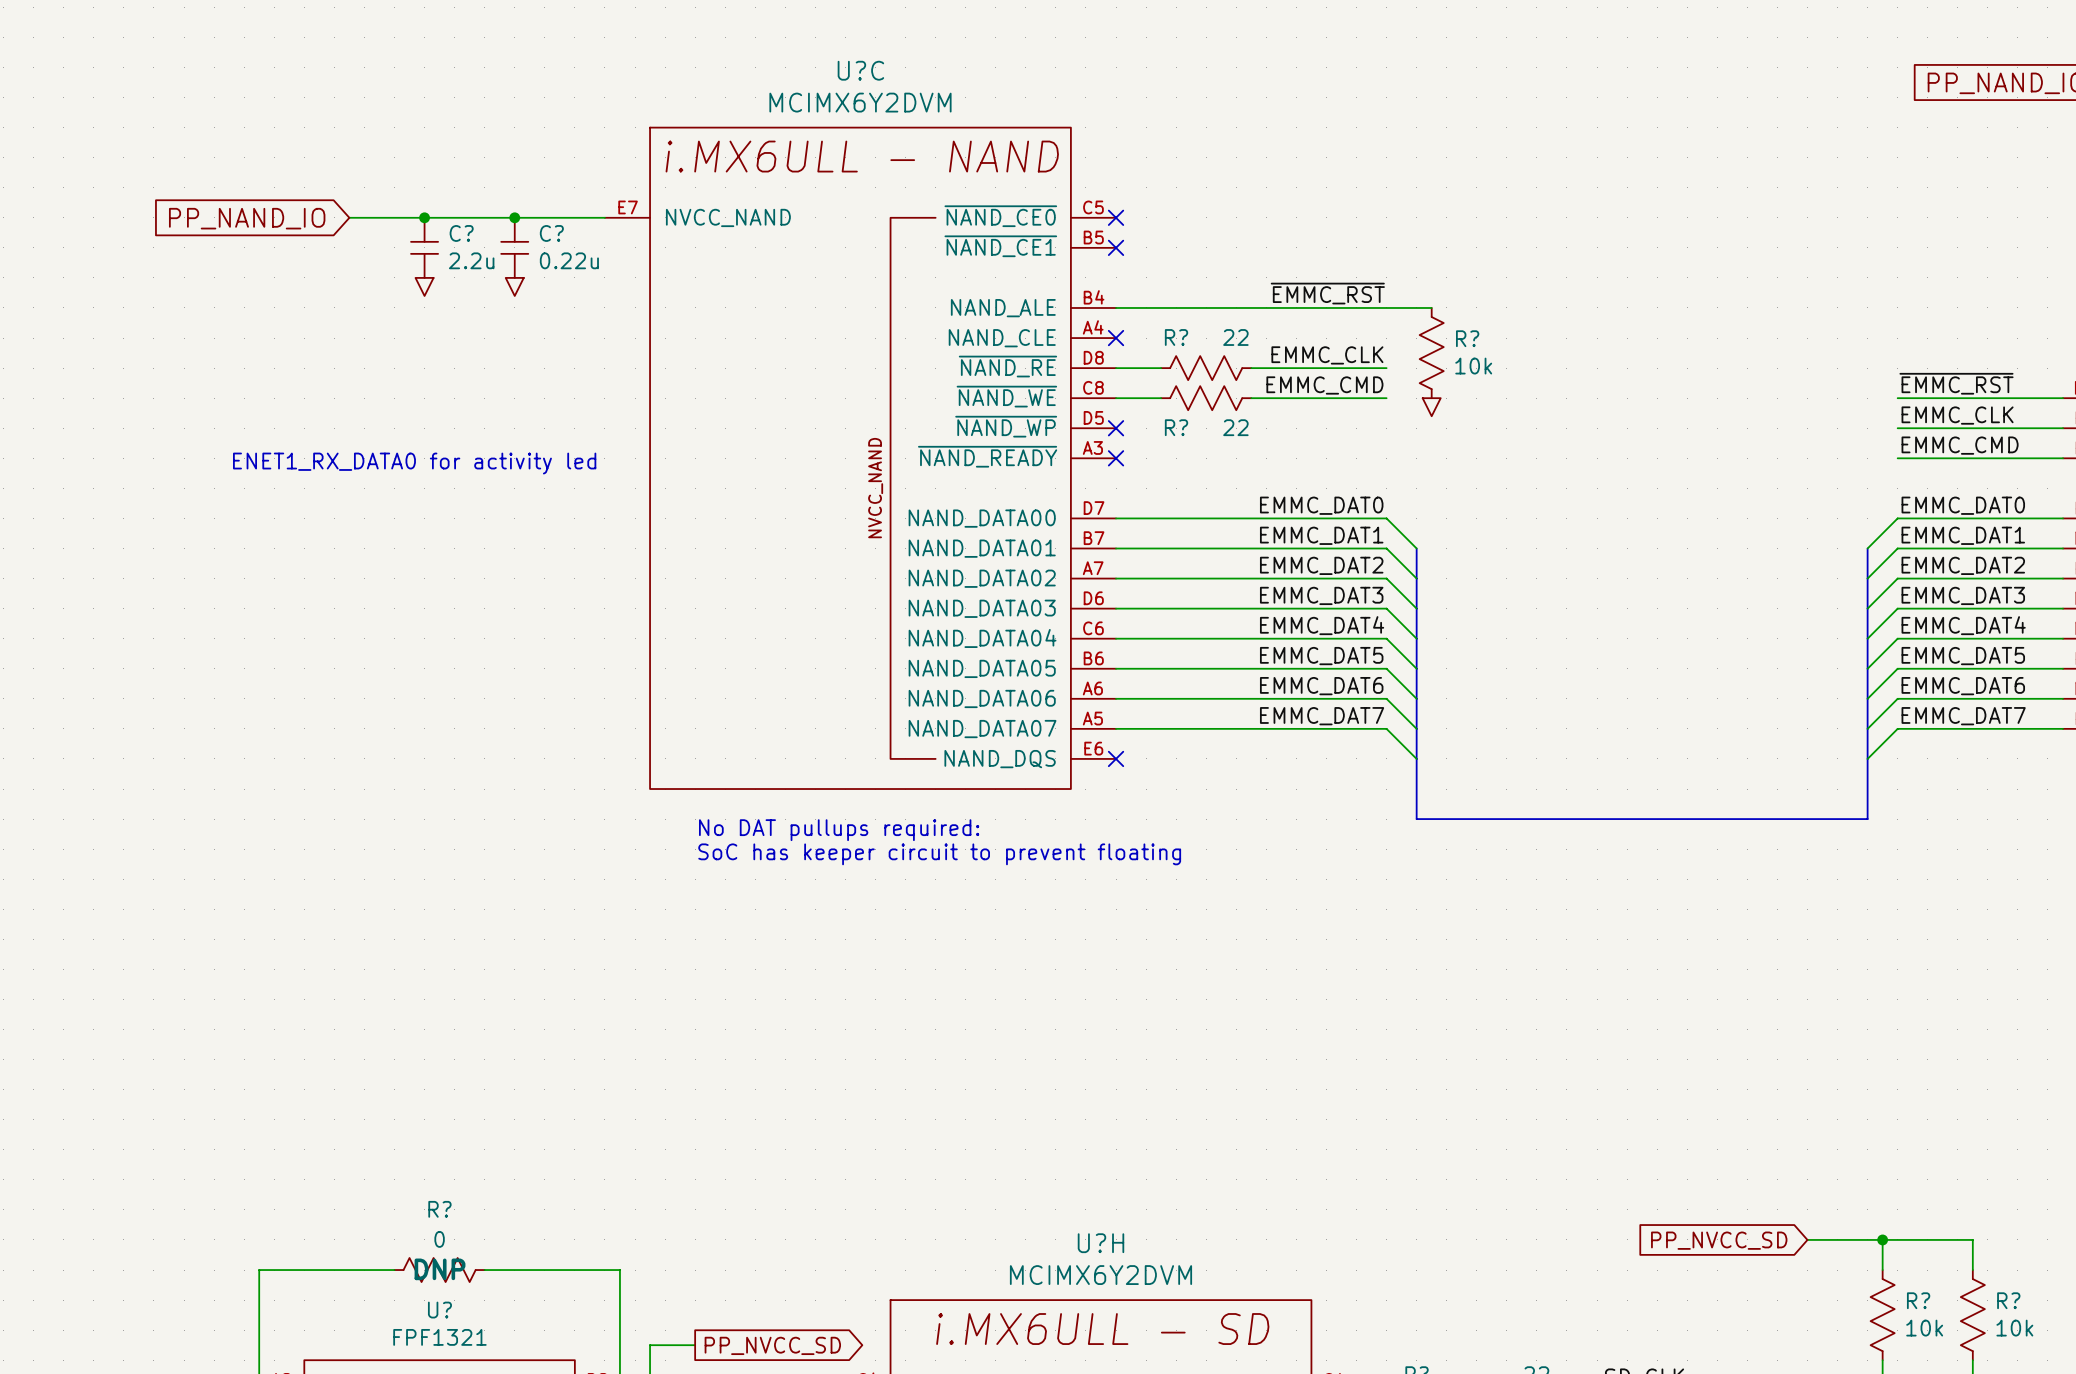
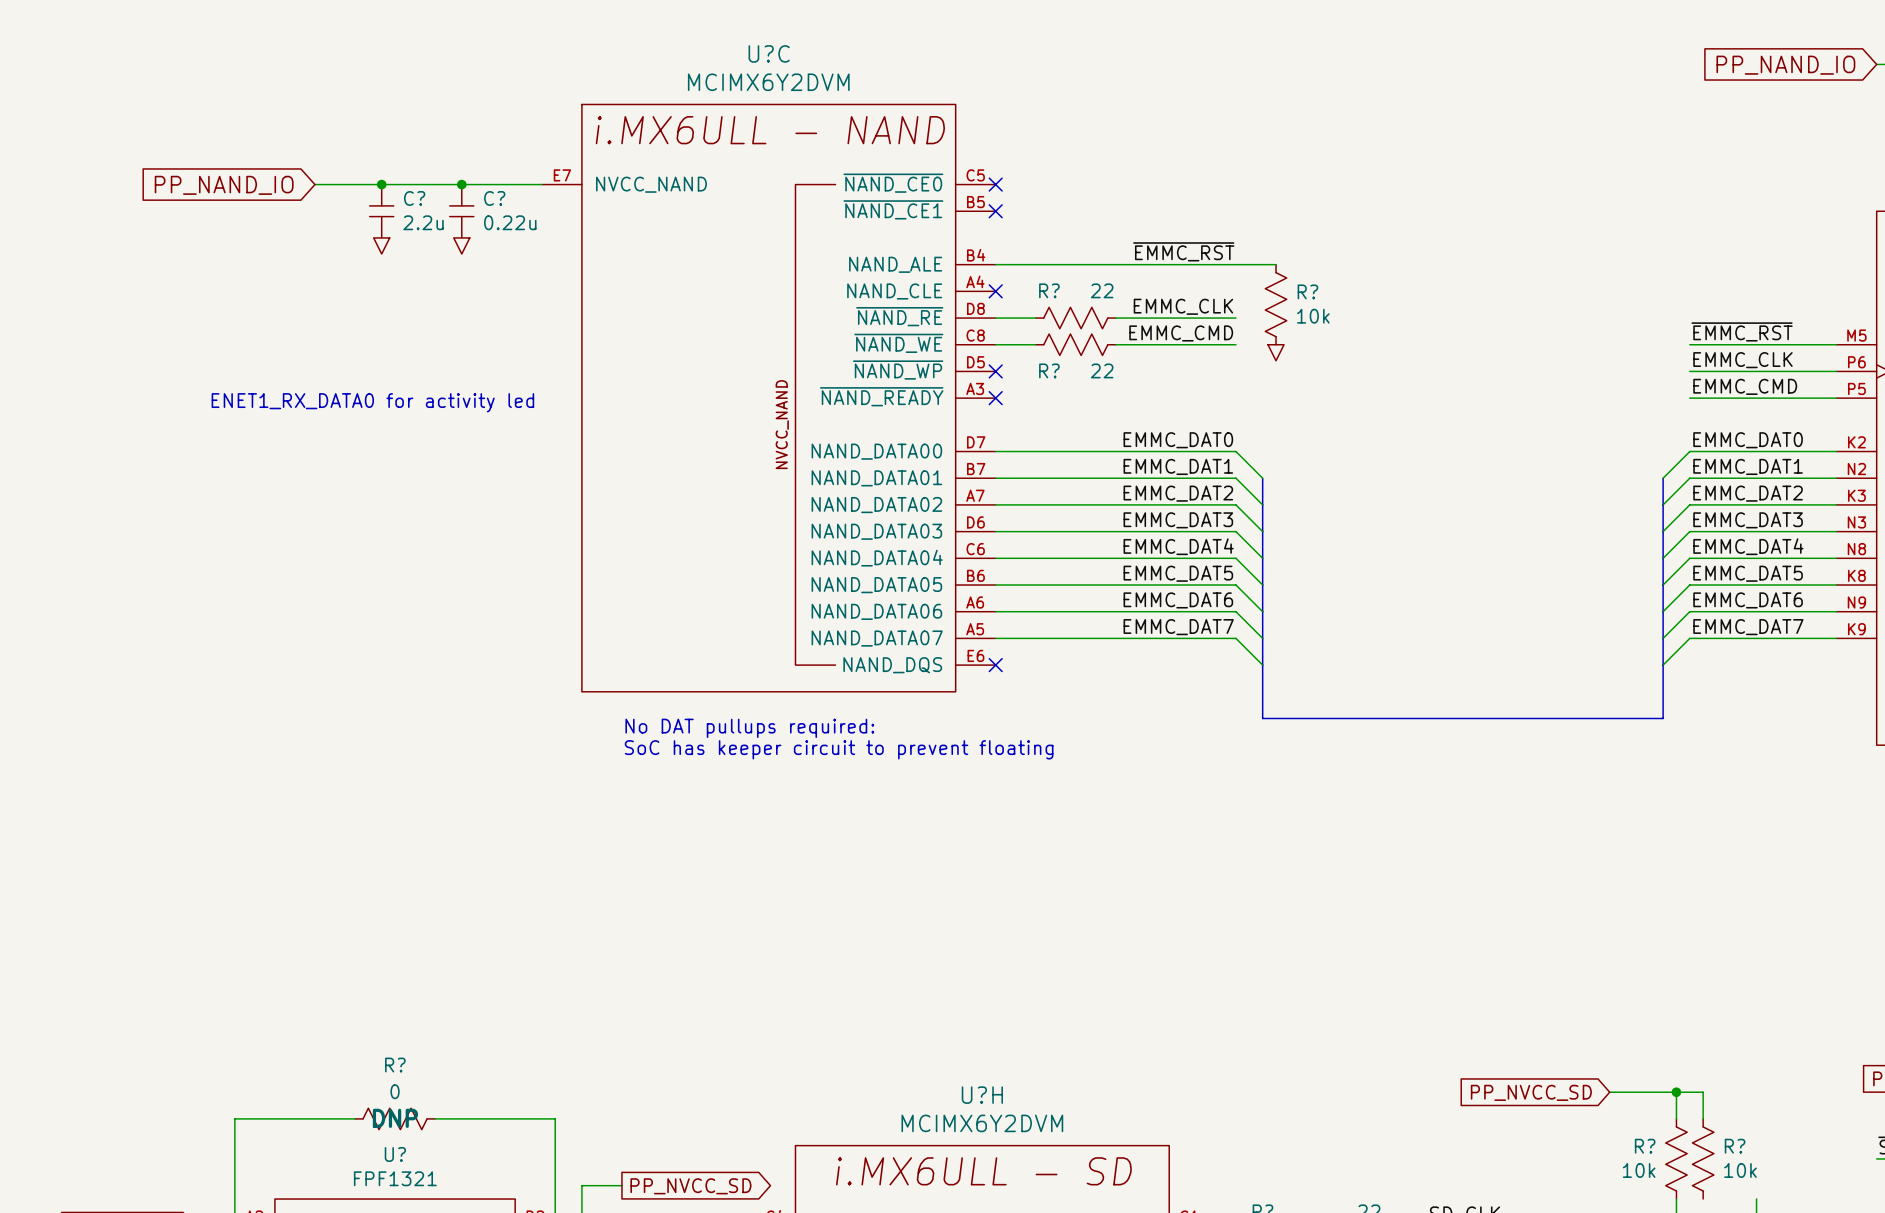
wire: (1912, 1239) (1972, 1239) (1972, 1270) -> (1703, 1092) (1703, 1118)
R? name position: R? (1918, 1300) -> R? (1645, 1146)
R? position: (1972, 1315) -> (1703, 1158)
R? value position: 10k (1924, 1328) -> 10k (1639, 1170)

